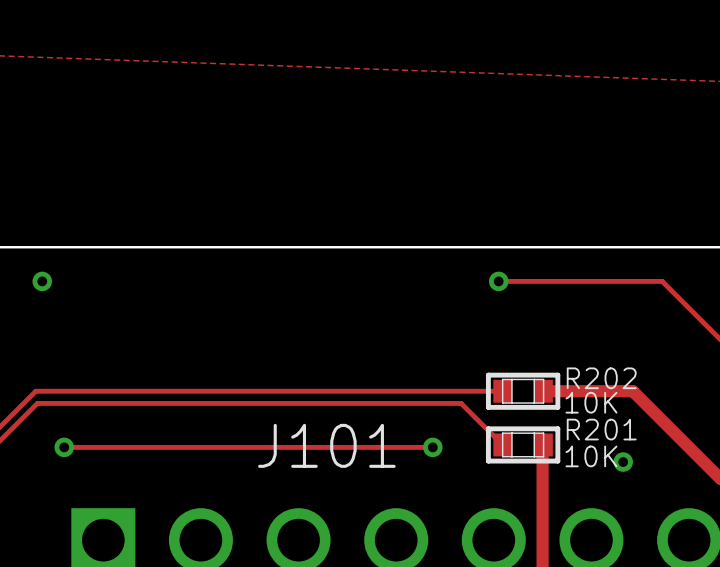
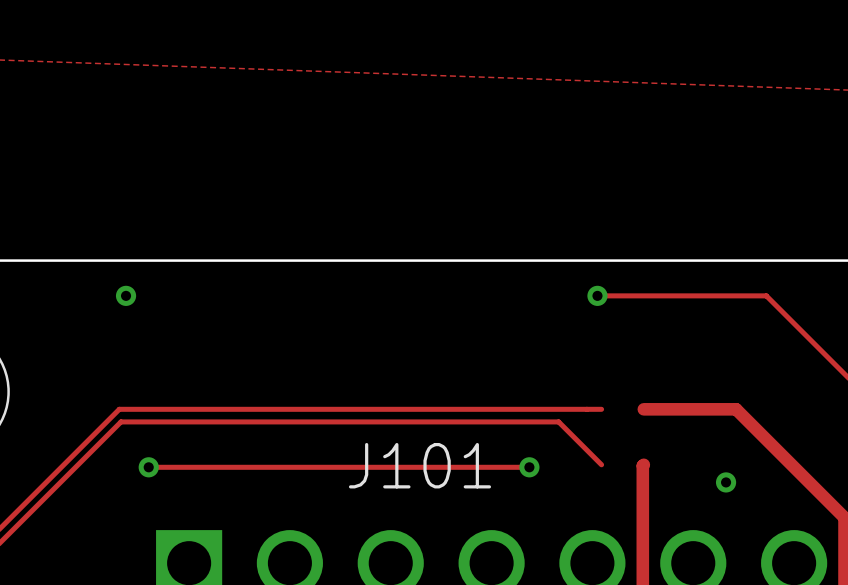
R202: 10K (523, 391) -> none
R201: 10K (523, 444) -> none

